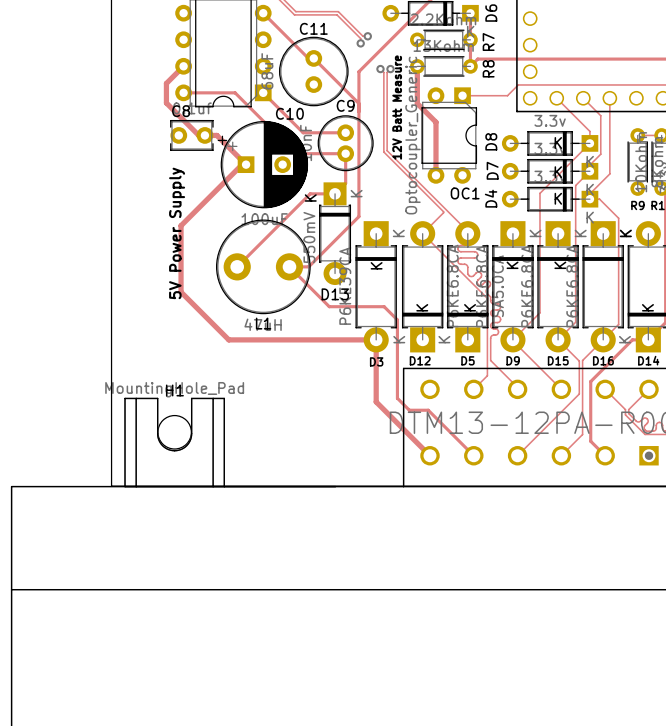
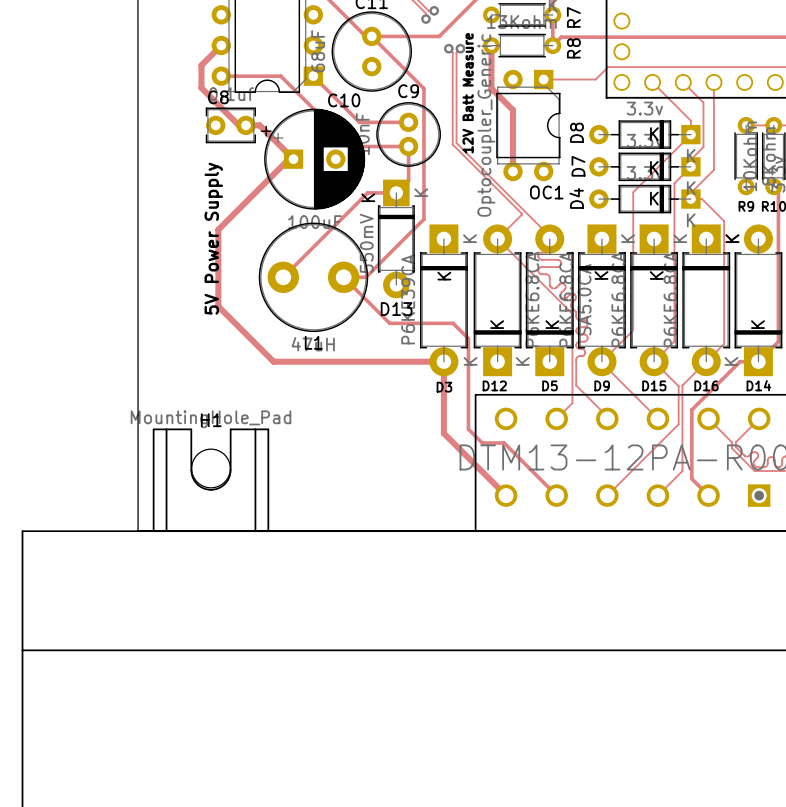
track: (372, 58) (358, 71) (358, 103) -> (439, 36) (371, 36)

